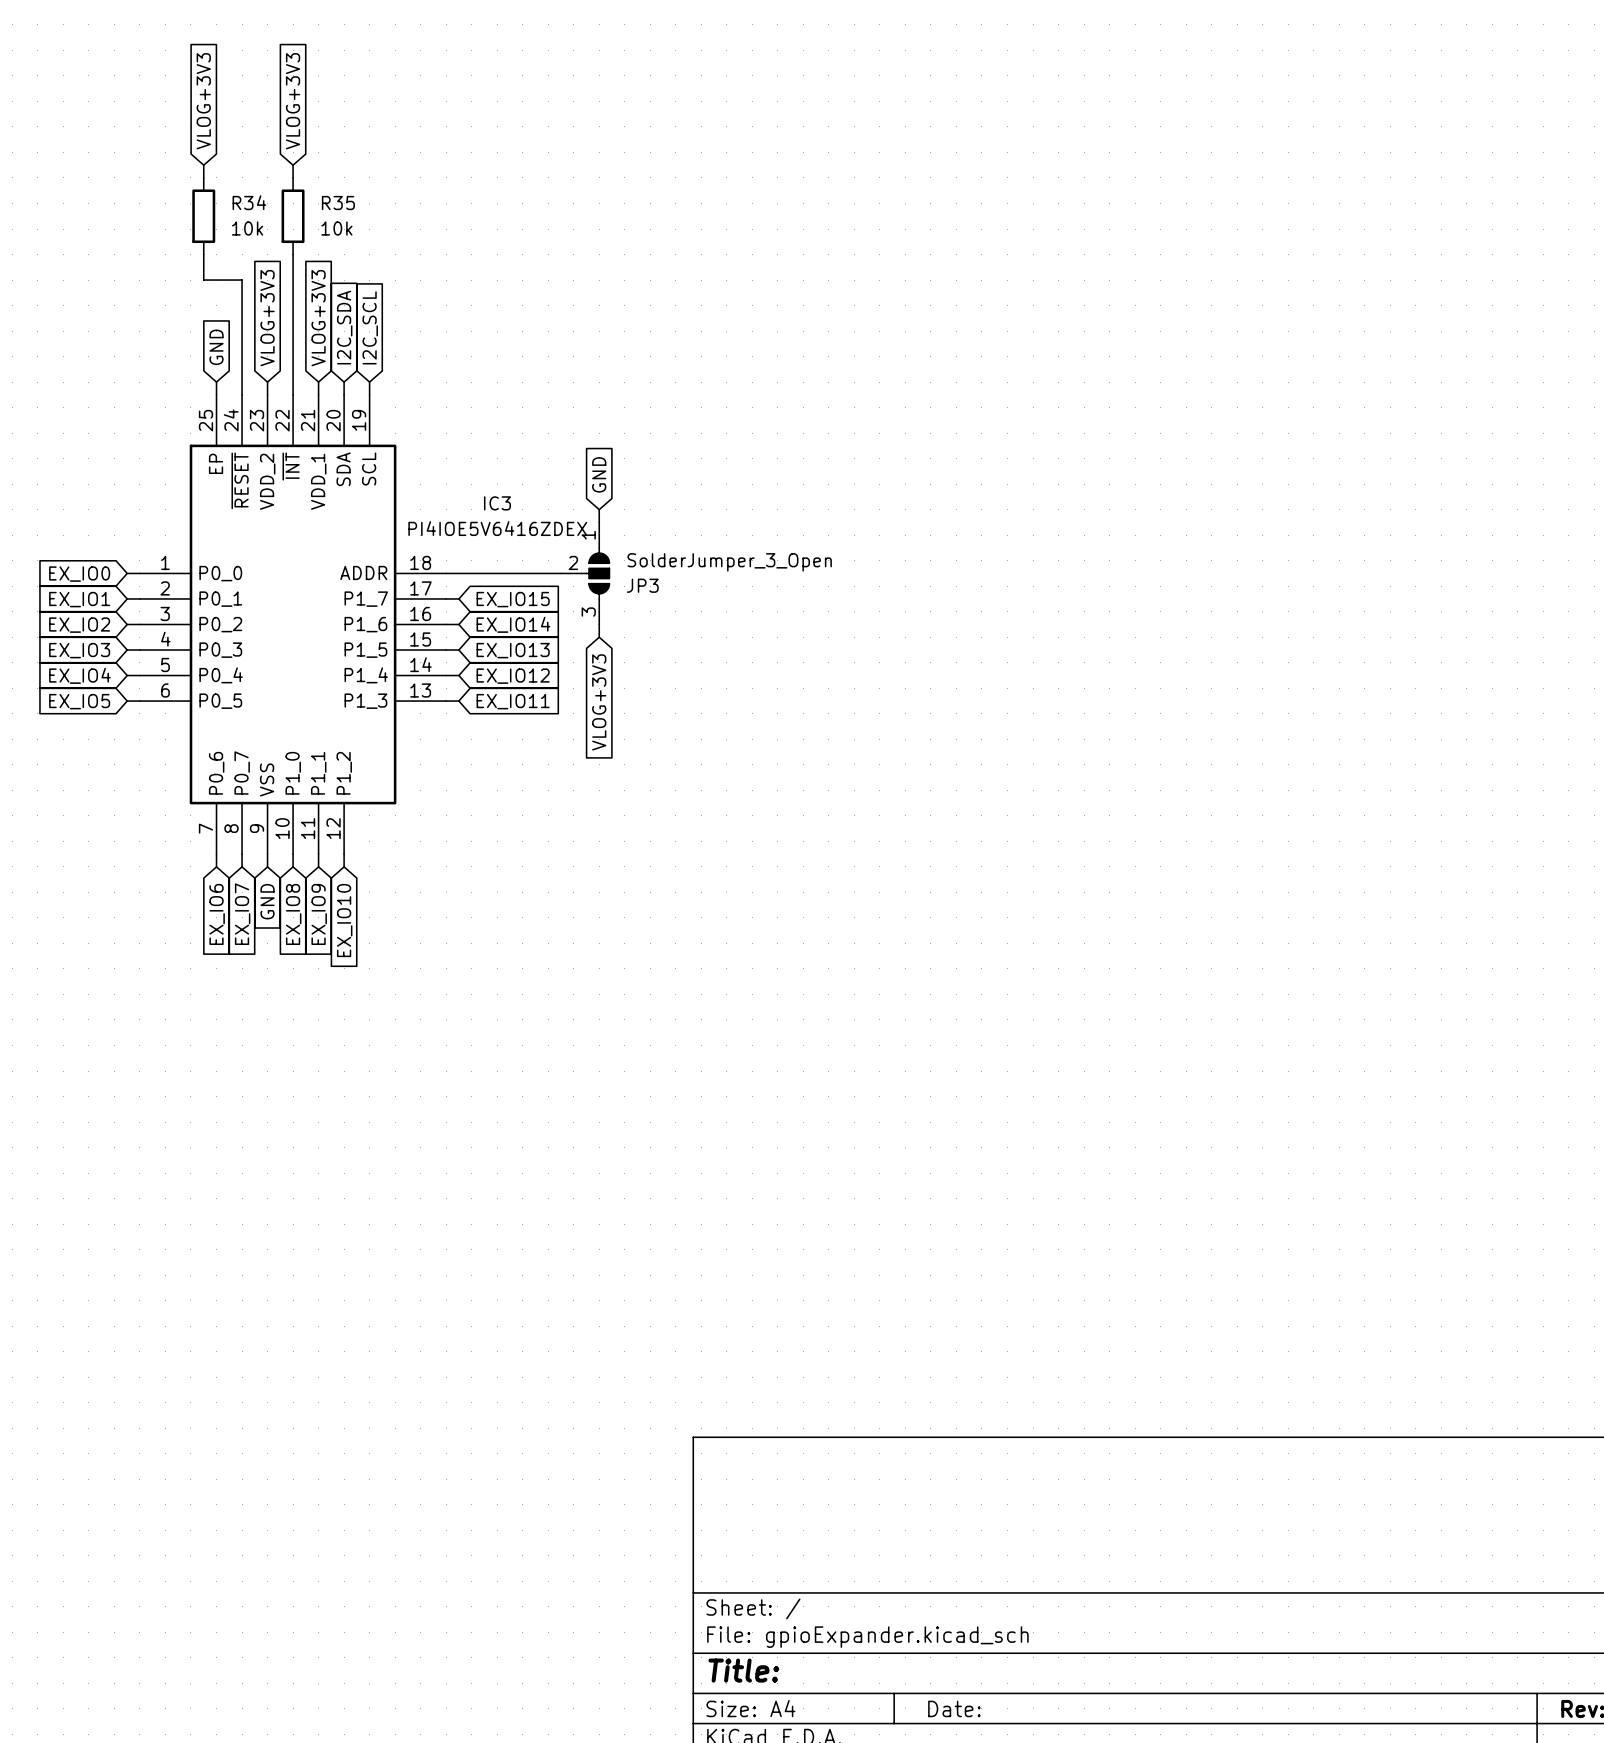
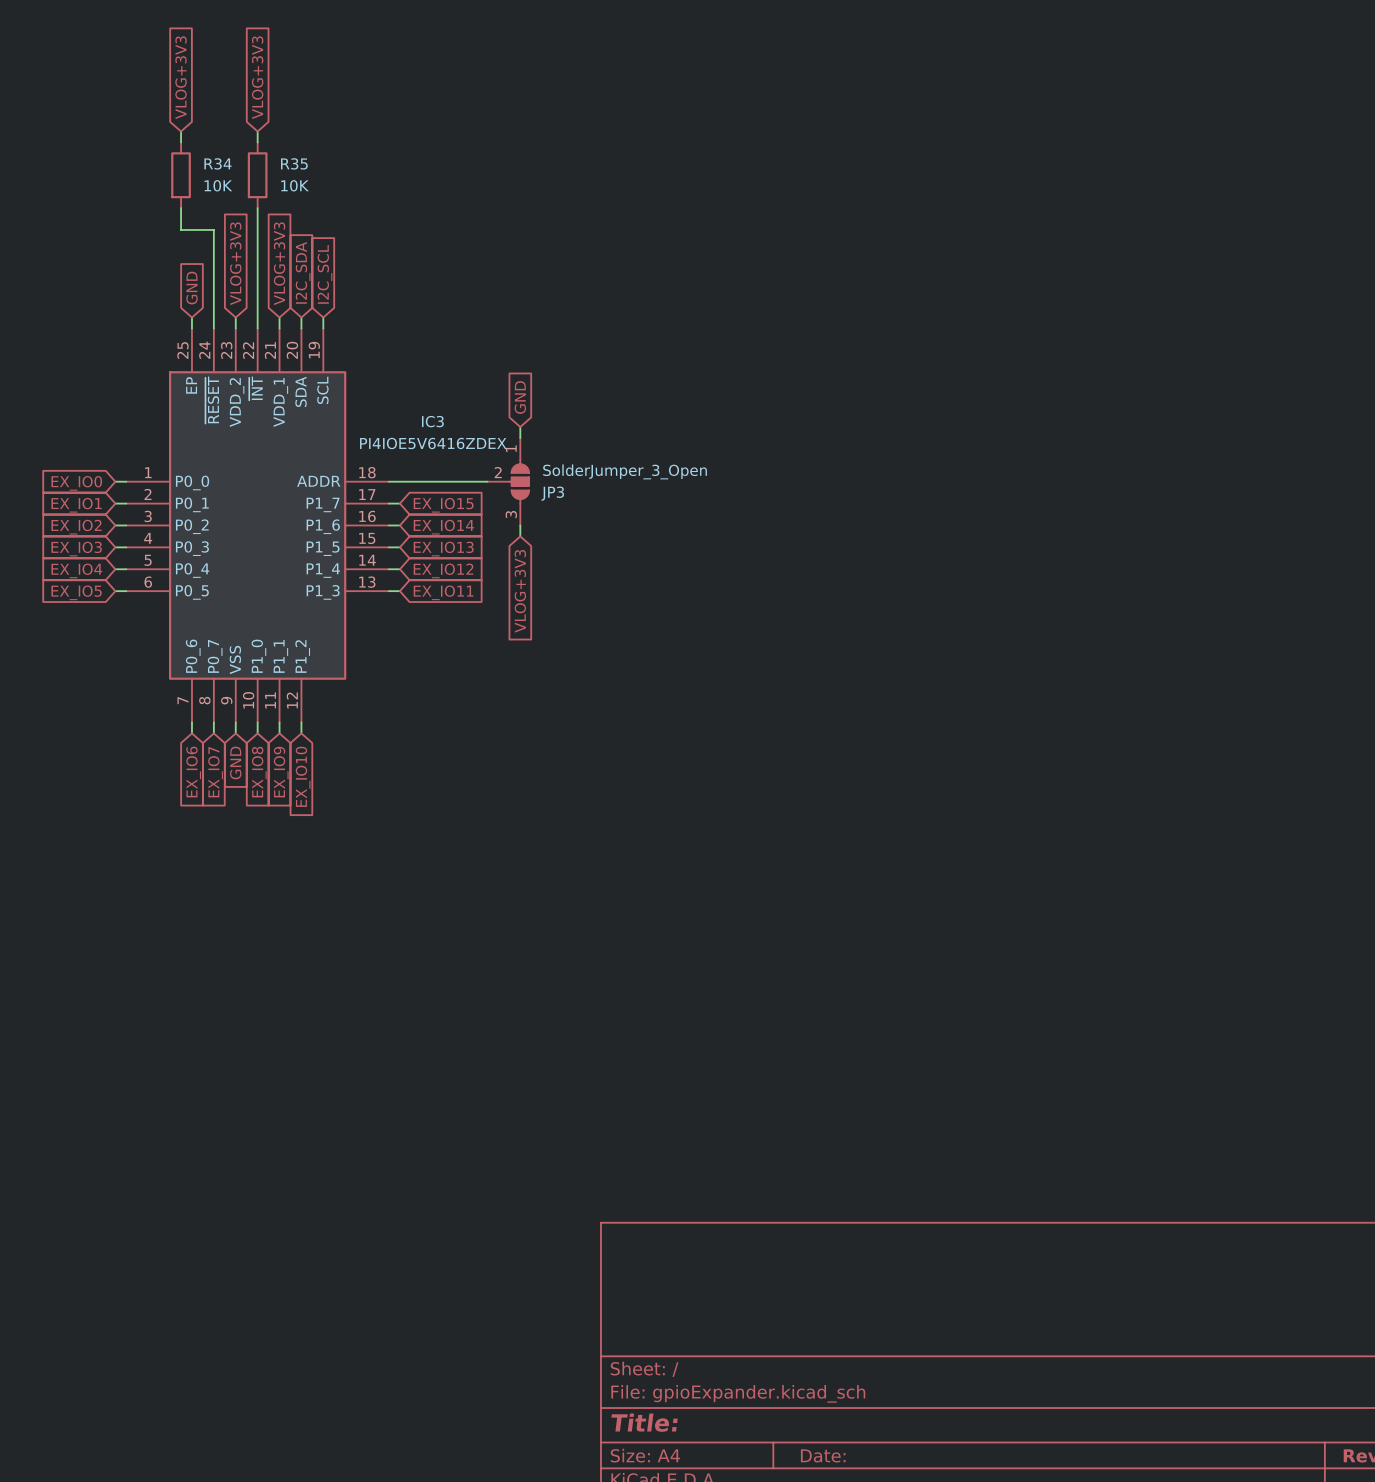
R34 value: 10k (247, 228) -> 10K (218, 185)
R35 value: 10k (336, 228) -> 10K (294, 185)

